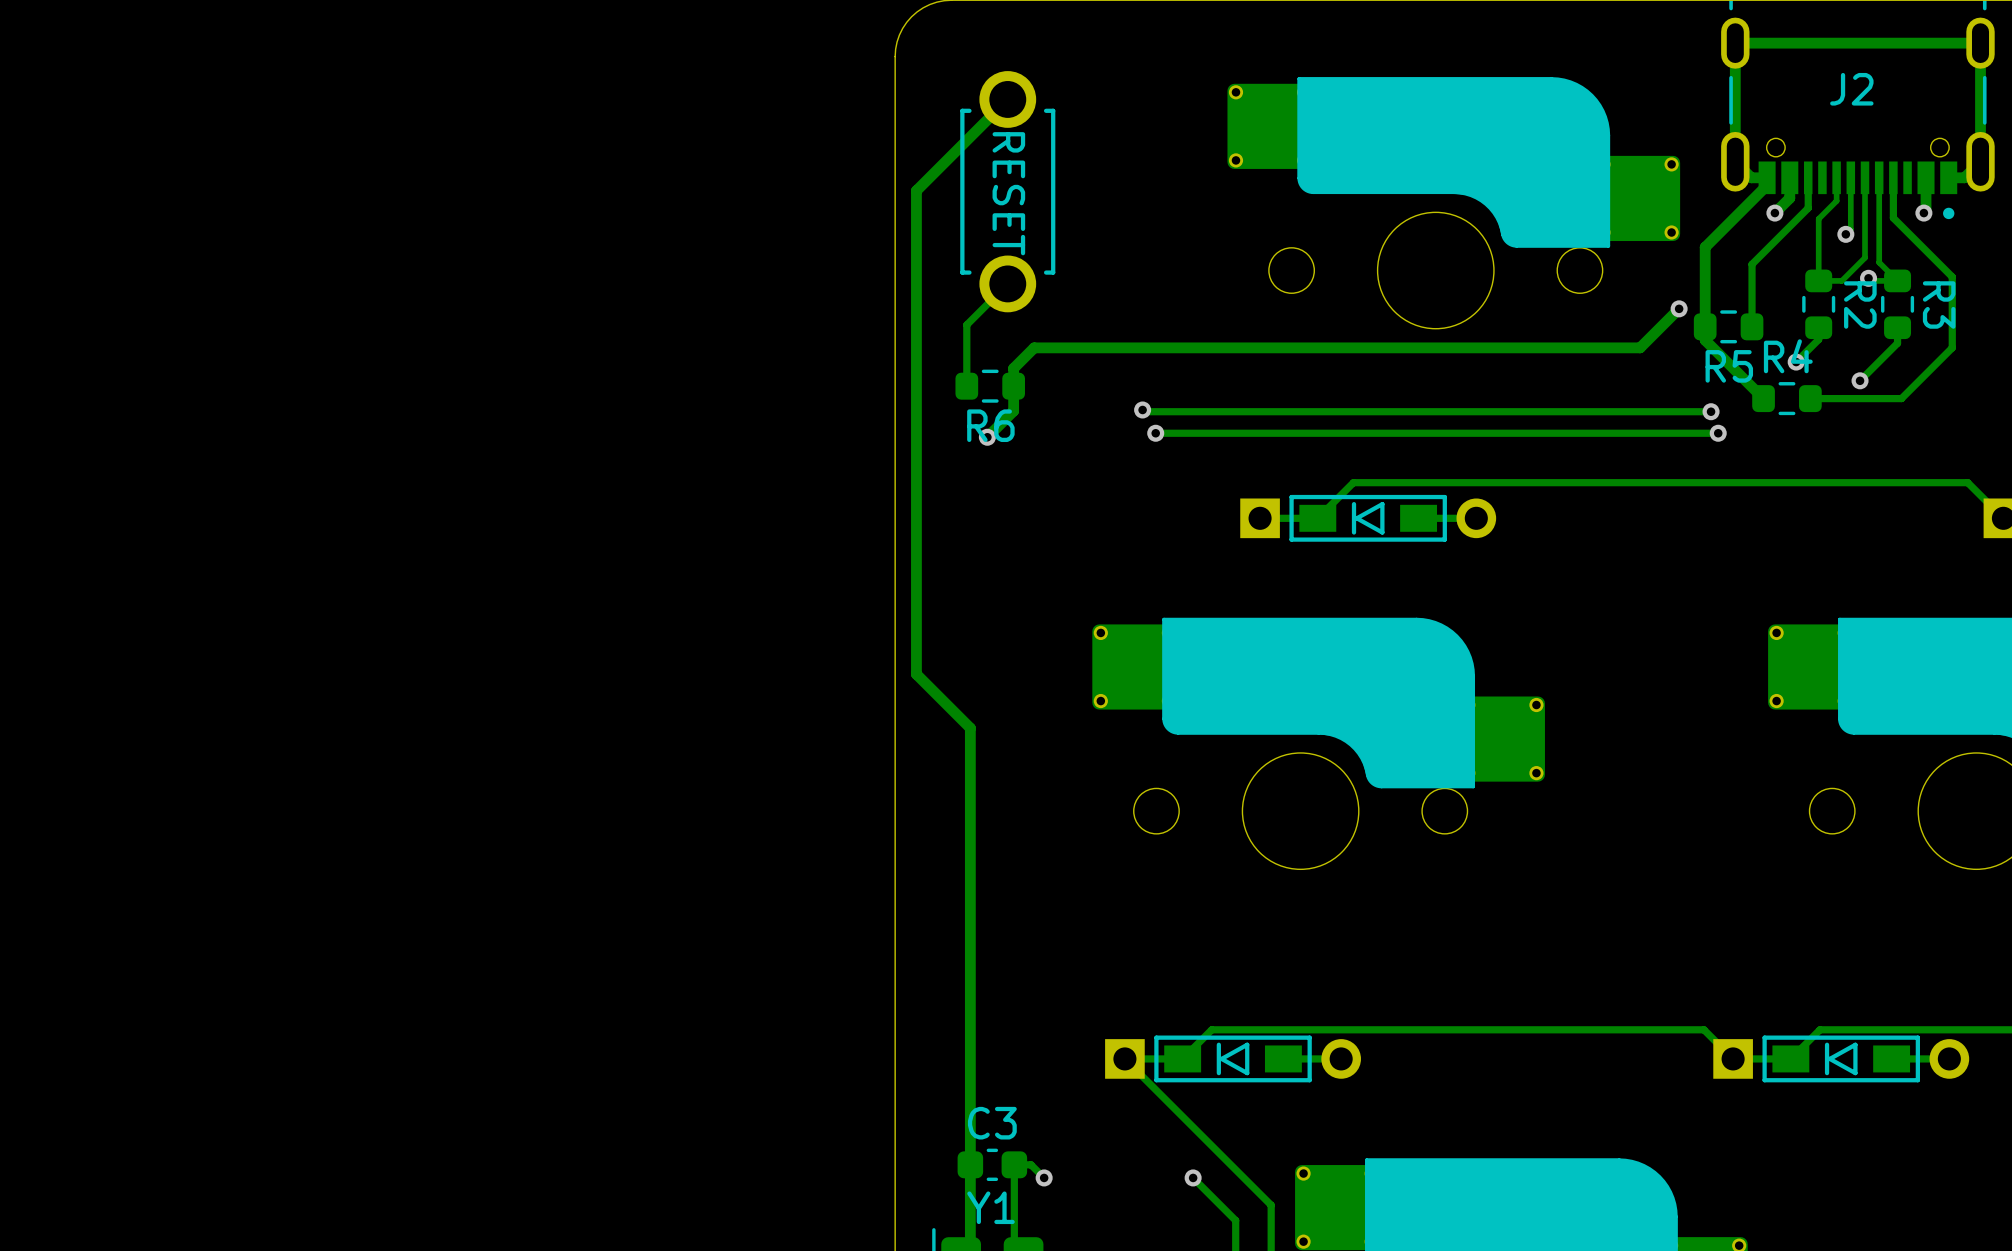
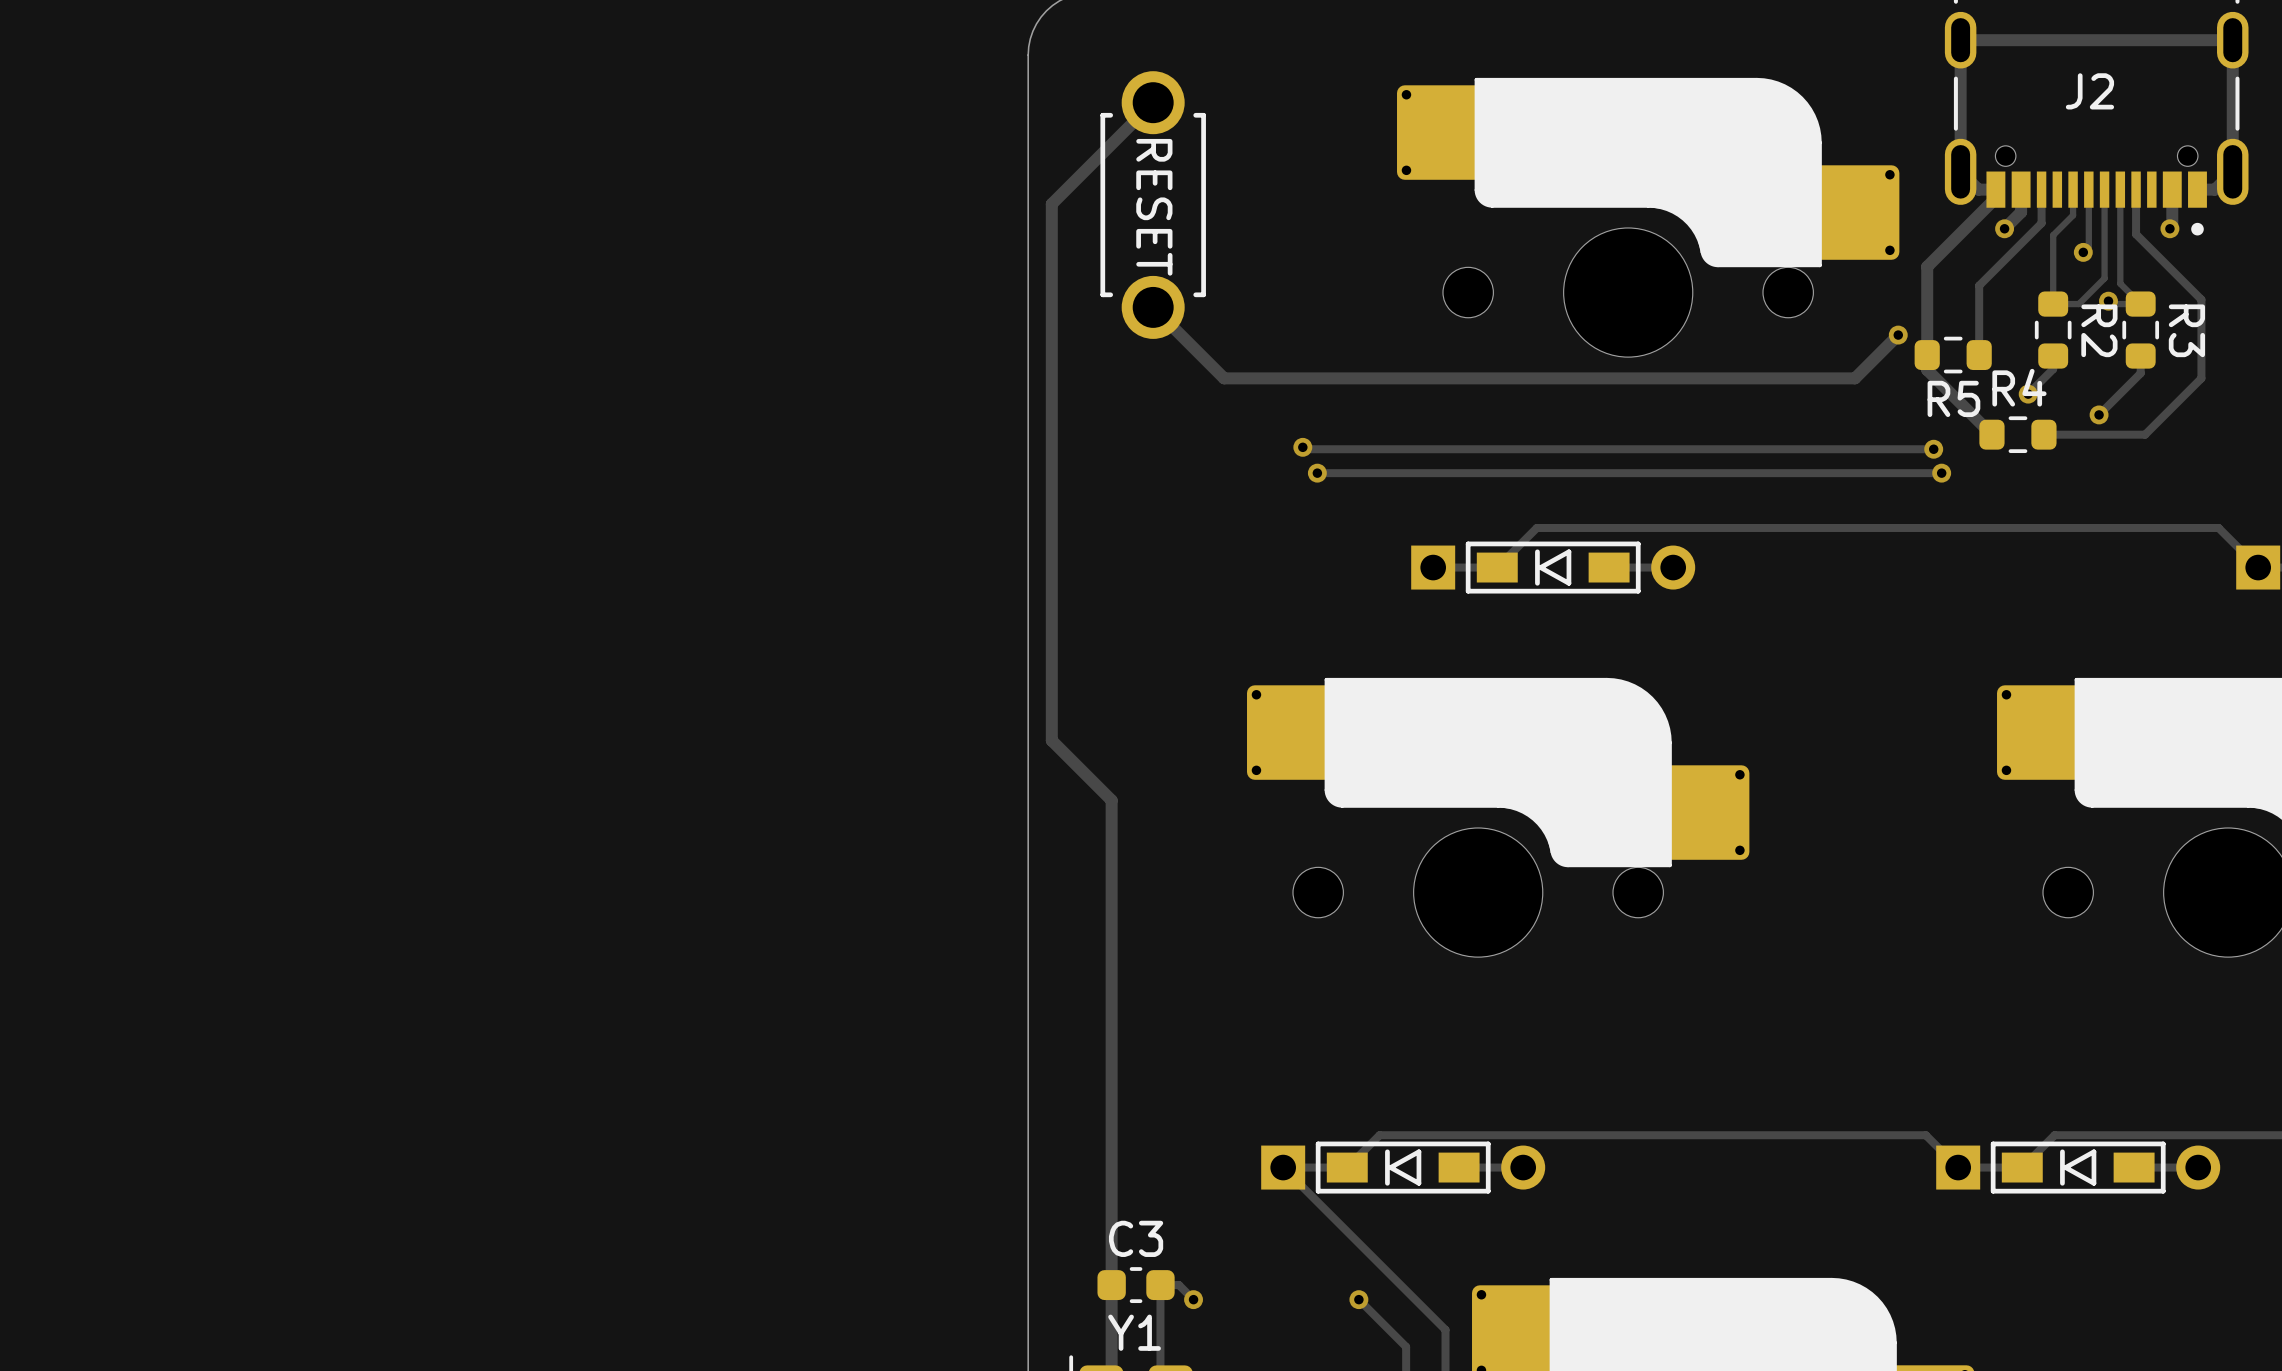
track: (1007, 283) (966, 324) (966, 386) -> (1153, 307) (1224, 378)
track: (1071, 347) (1034, 347) (1013, 368) (1013, 411) (987, 437) -> none
R6: (990, 386) -> none
via: (987, 437) -> none

